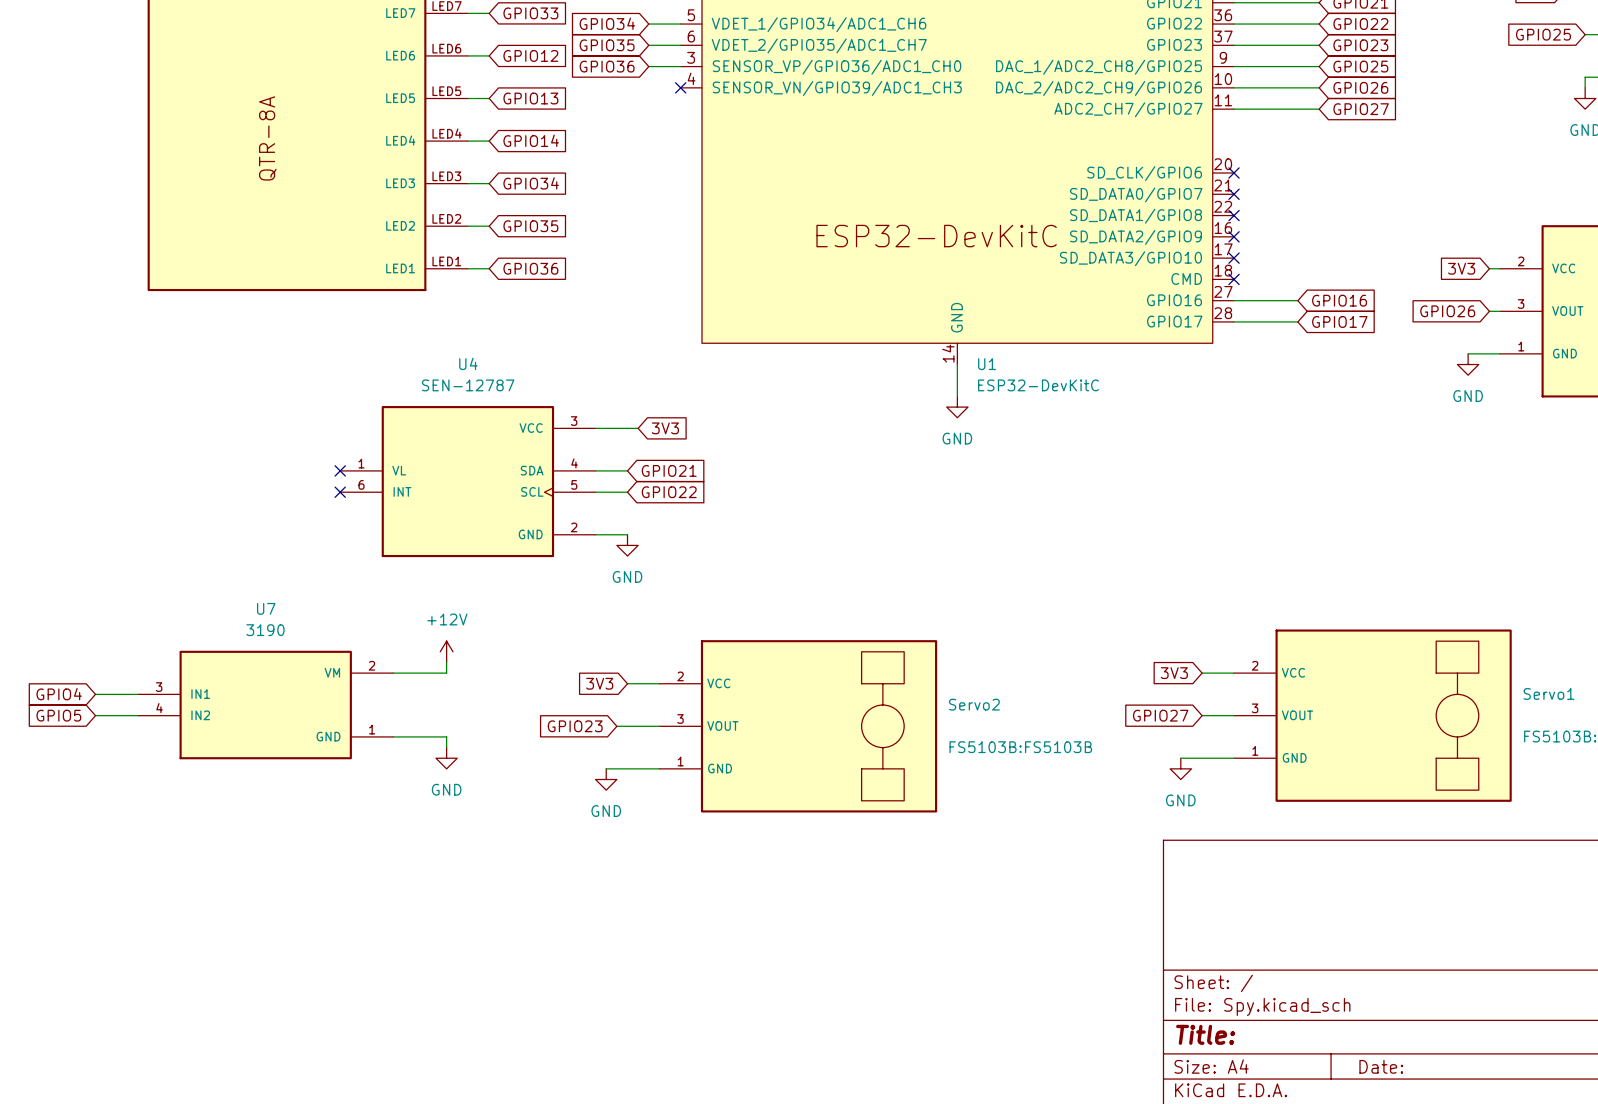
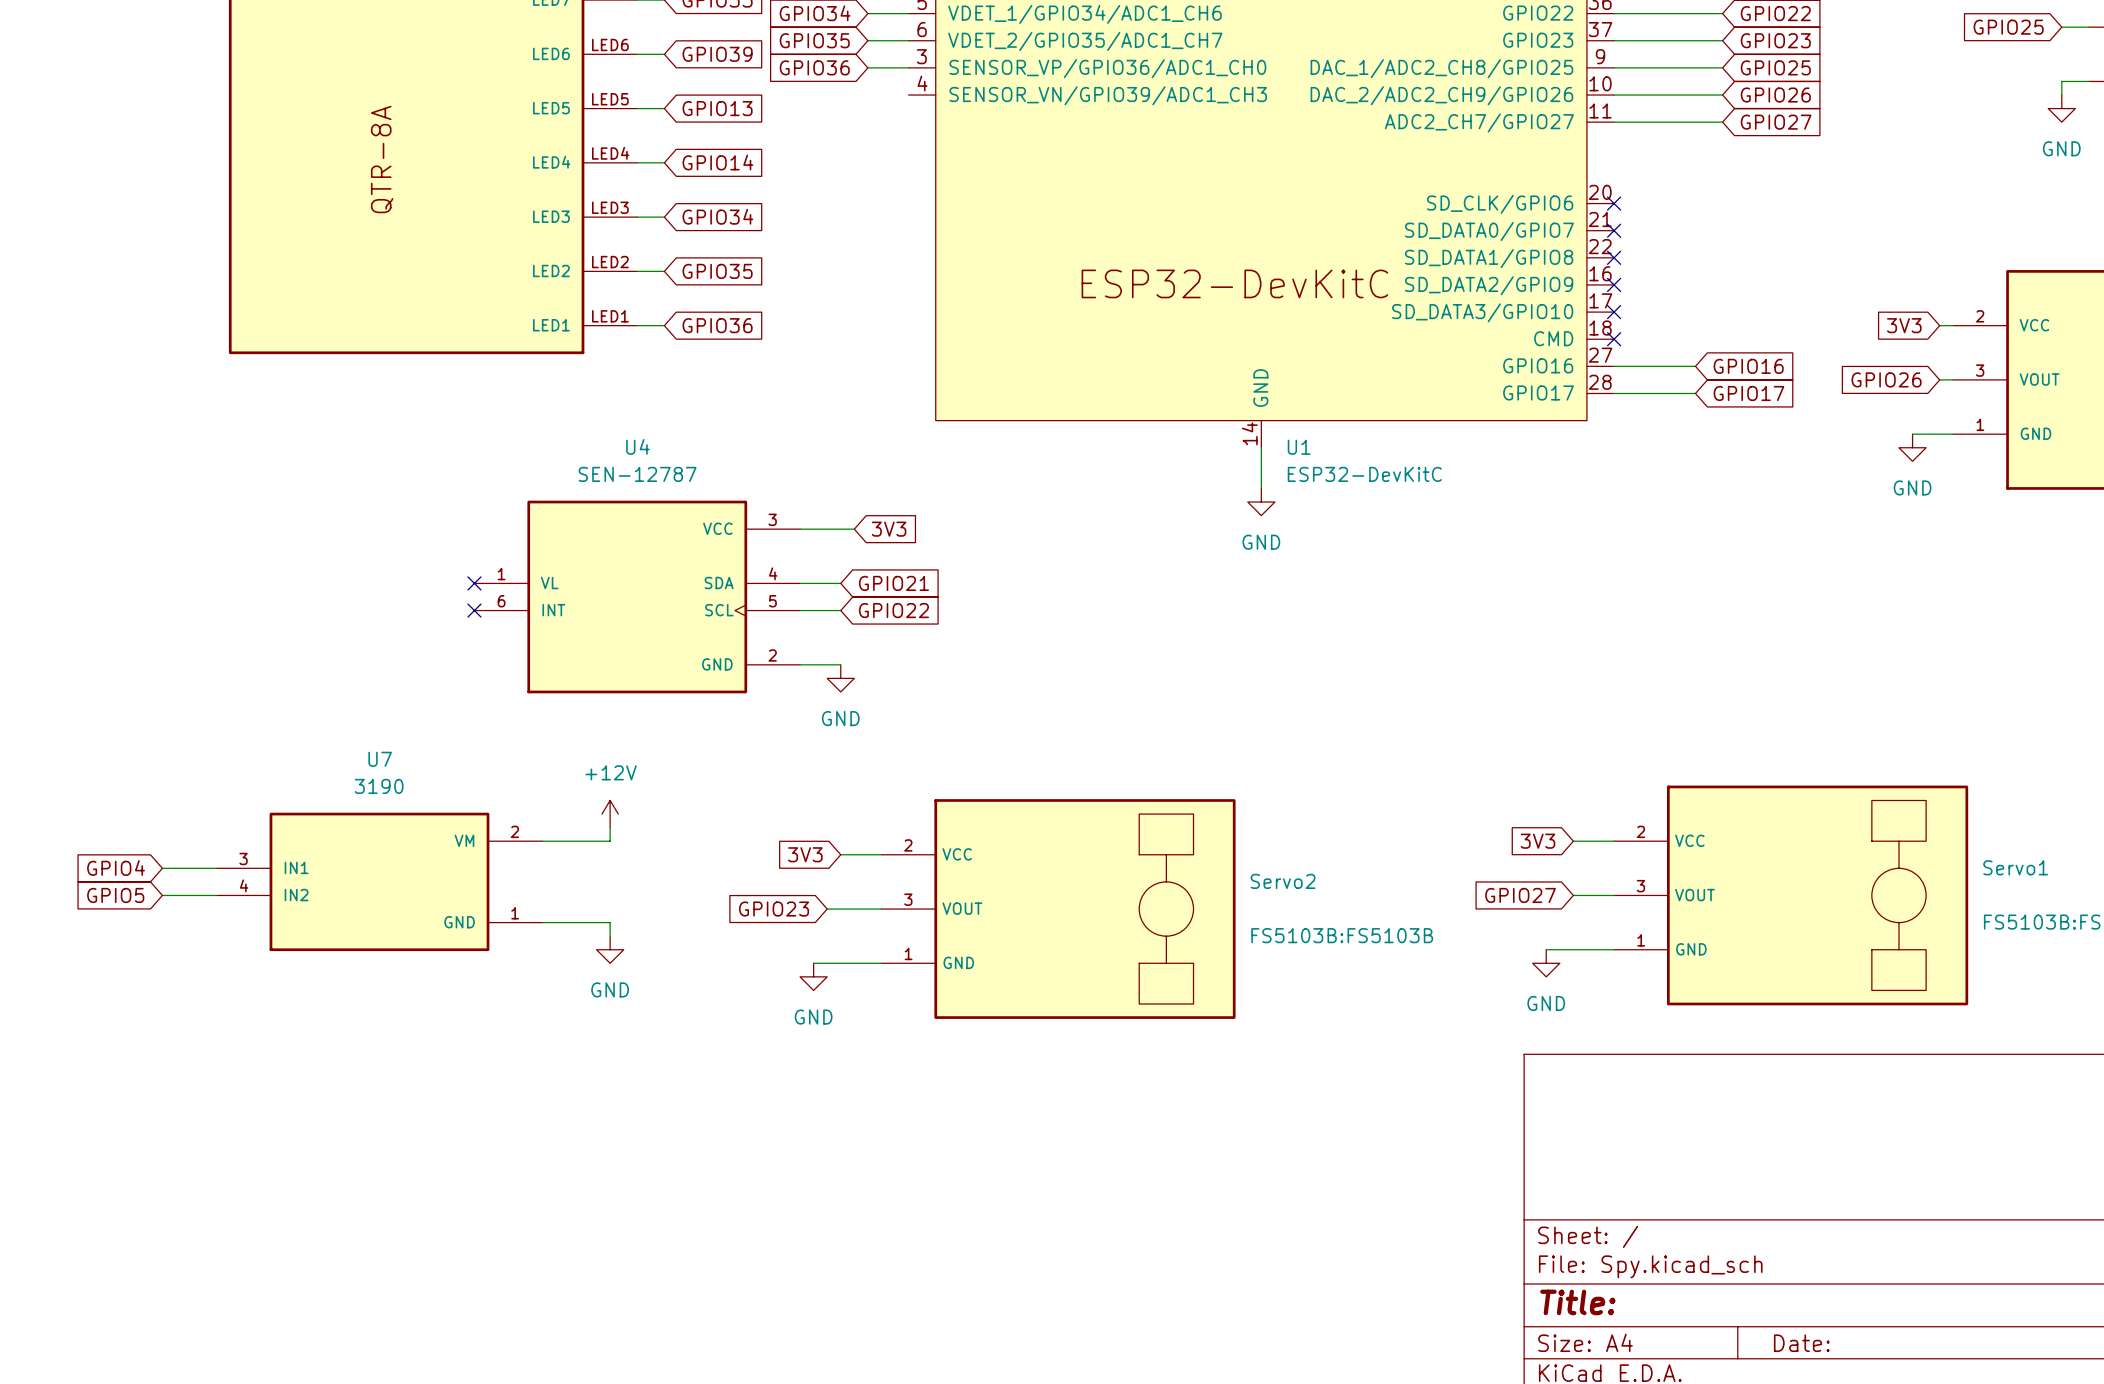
global label: GPIO12 (530, 55) -> GPIO39 (717, 54)
no-connect mark: (680, 87) -> none

